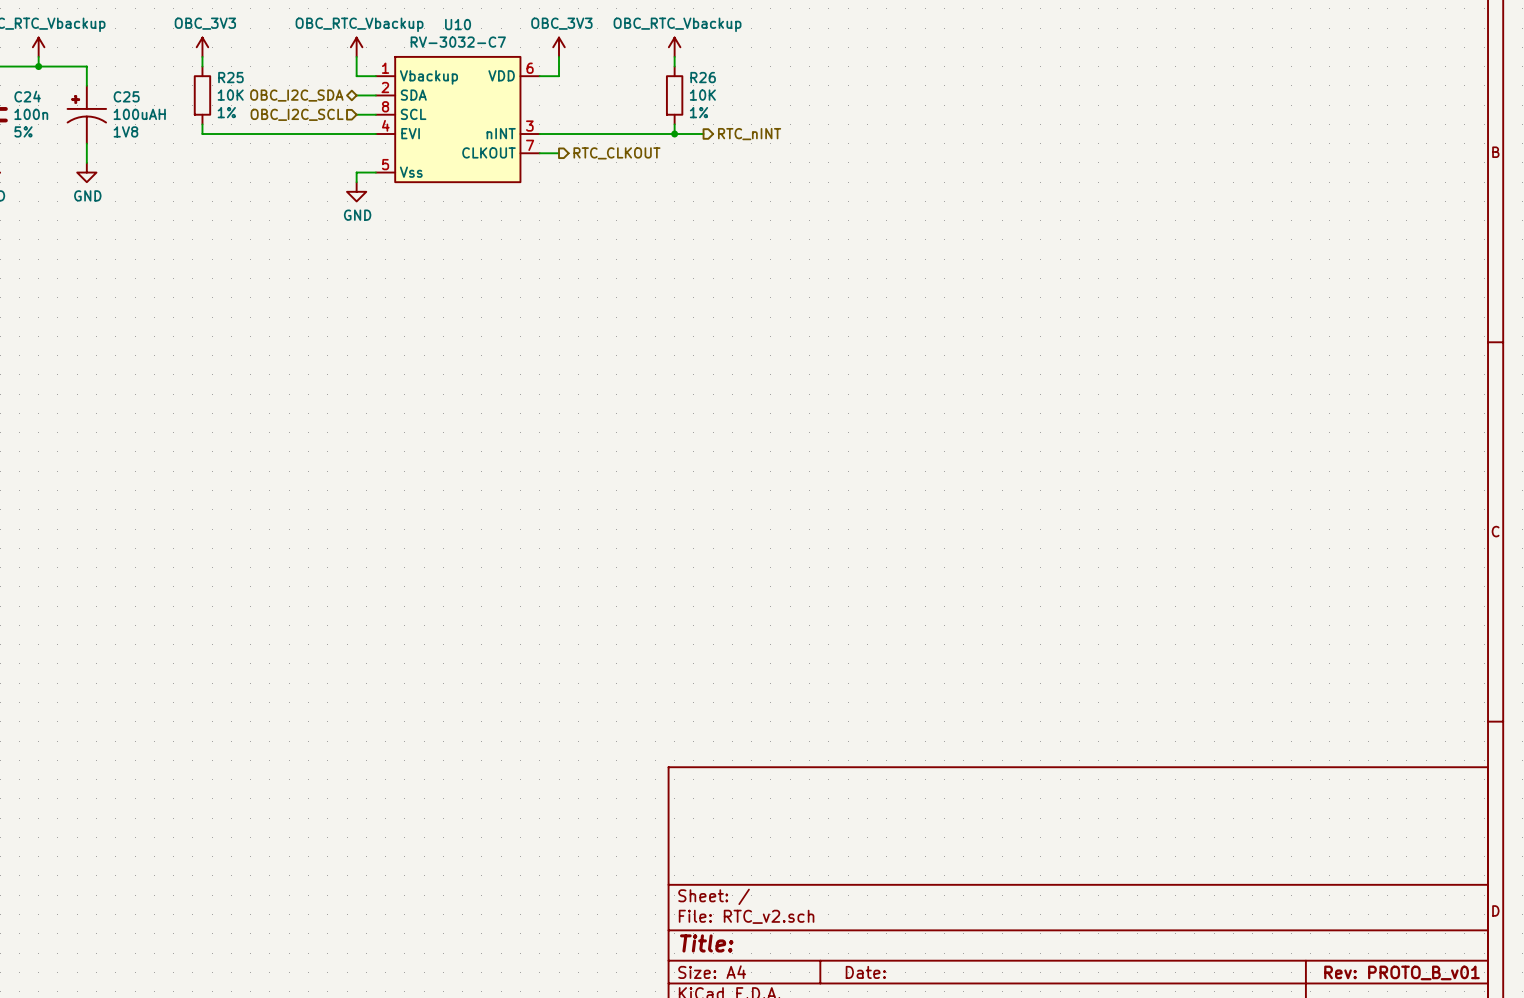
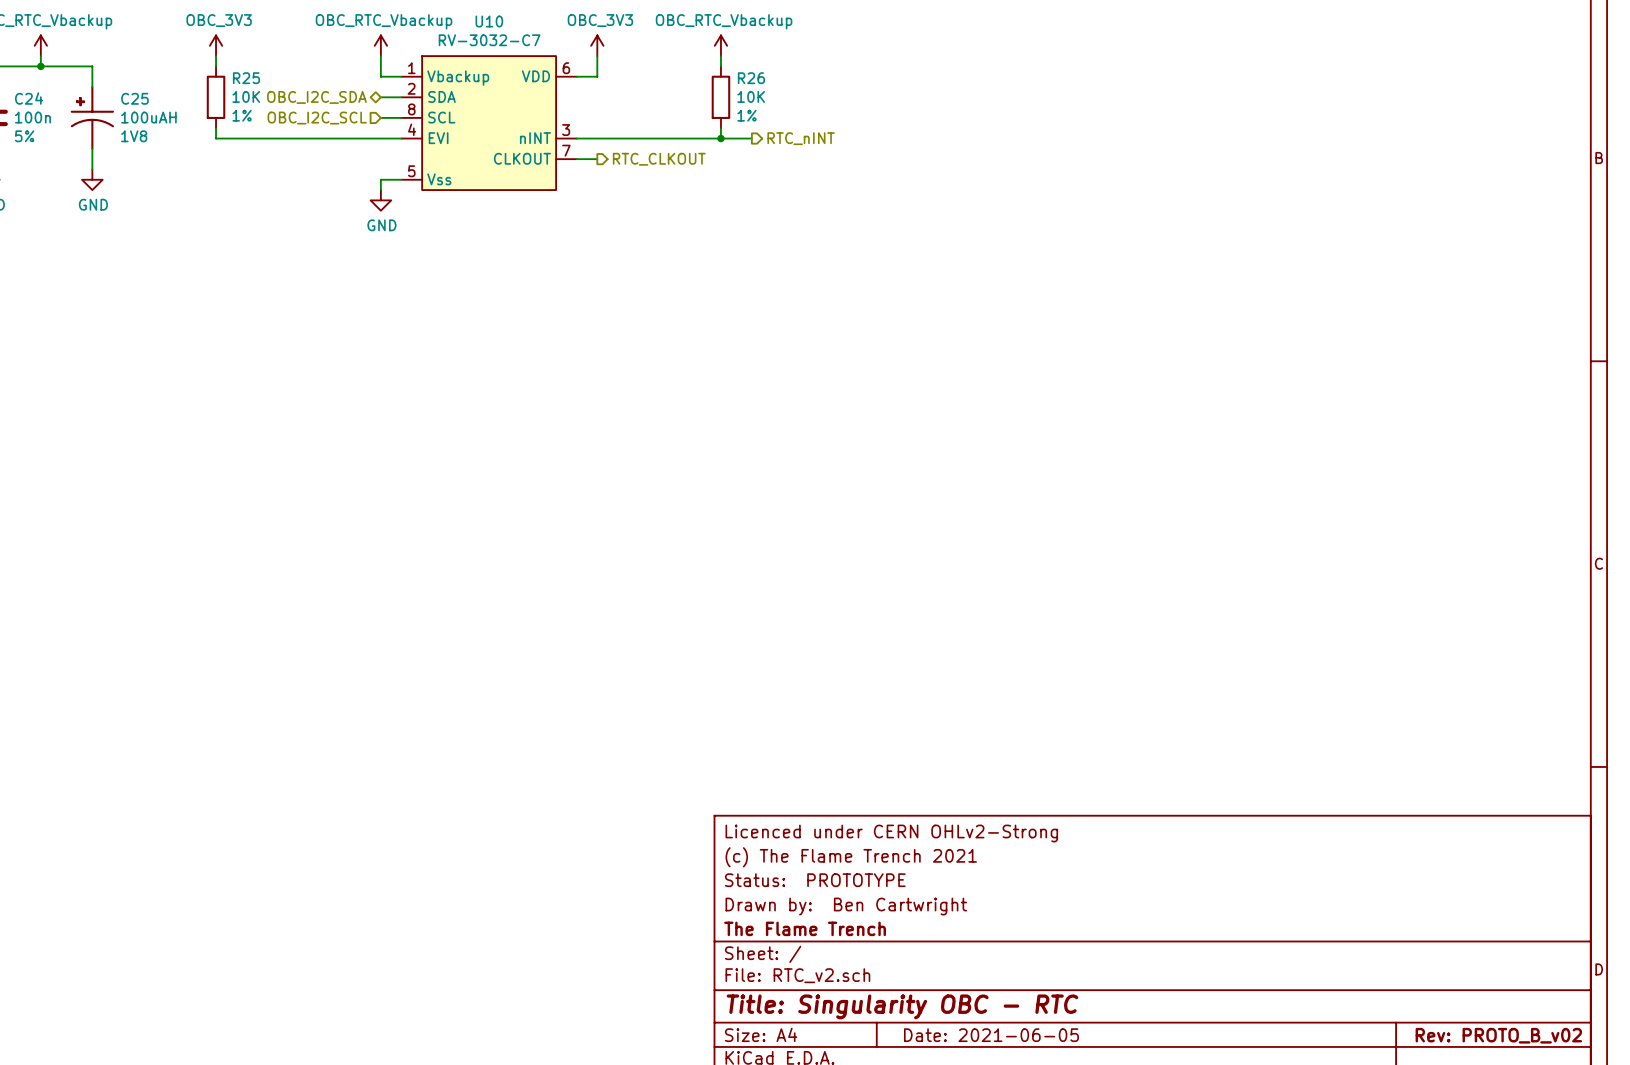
title block: none -> Licenced under CERN OHLv2-Strong (891, 833)
title block: none -> (c) The Flame Trench 2021 (851, 857)
title block: none -> Status: PROTOTYPE (815, 880)
title block: none -> Drawn by: Ben Cartwright (846, 906)
title block: none -> The Flame Trench (805, 928)
title block: Title: (706, 943) -> Title: Singularity OBC - RTC (902, 1006)
title block: Date: (865, 972) -> Date: 2021-06-05 (991, 1035)
title block: Rev: PROTO_B_v01 (1401, 972) -> Rev: PROTO_B_v02 (1498, 1035)

